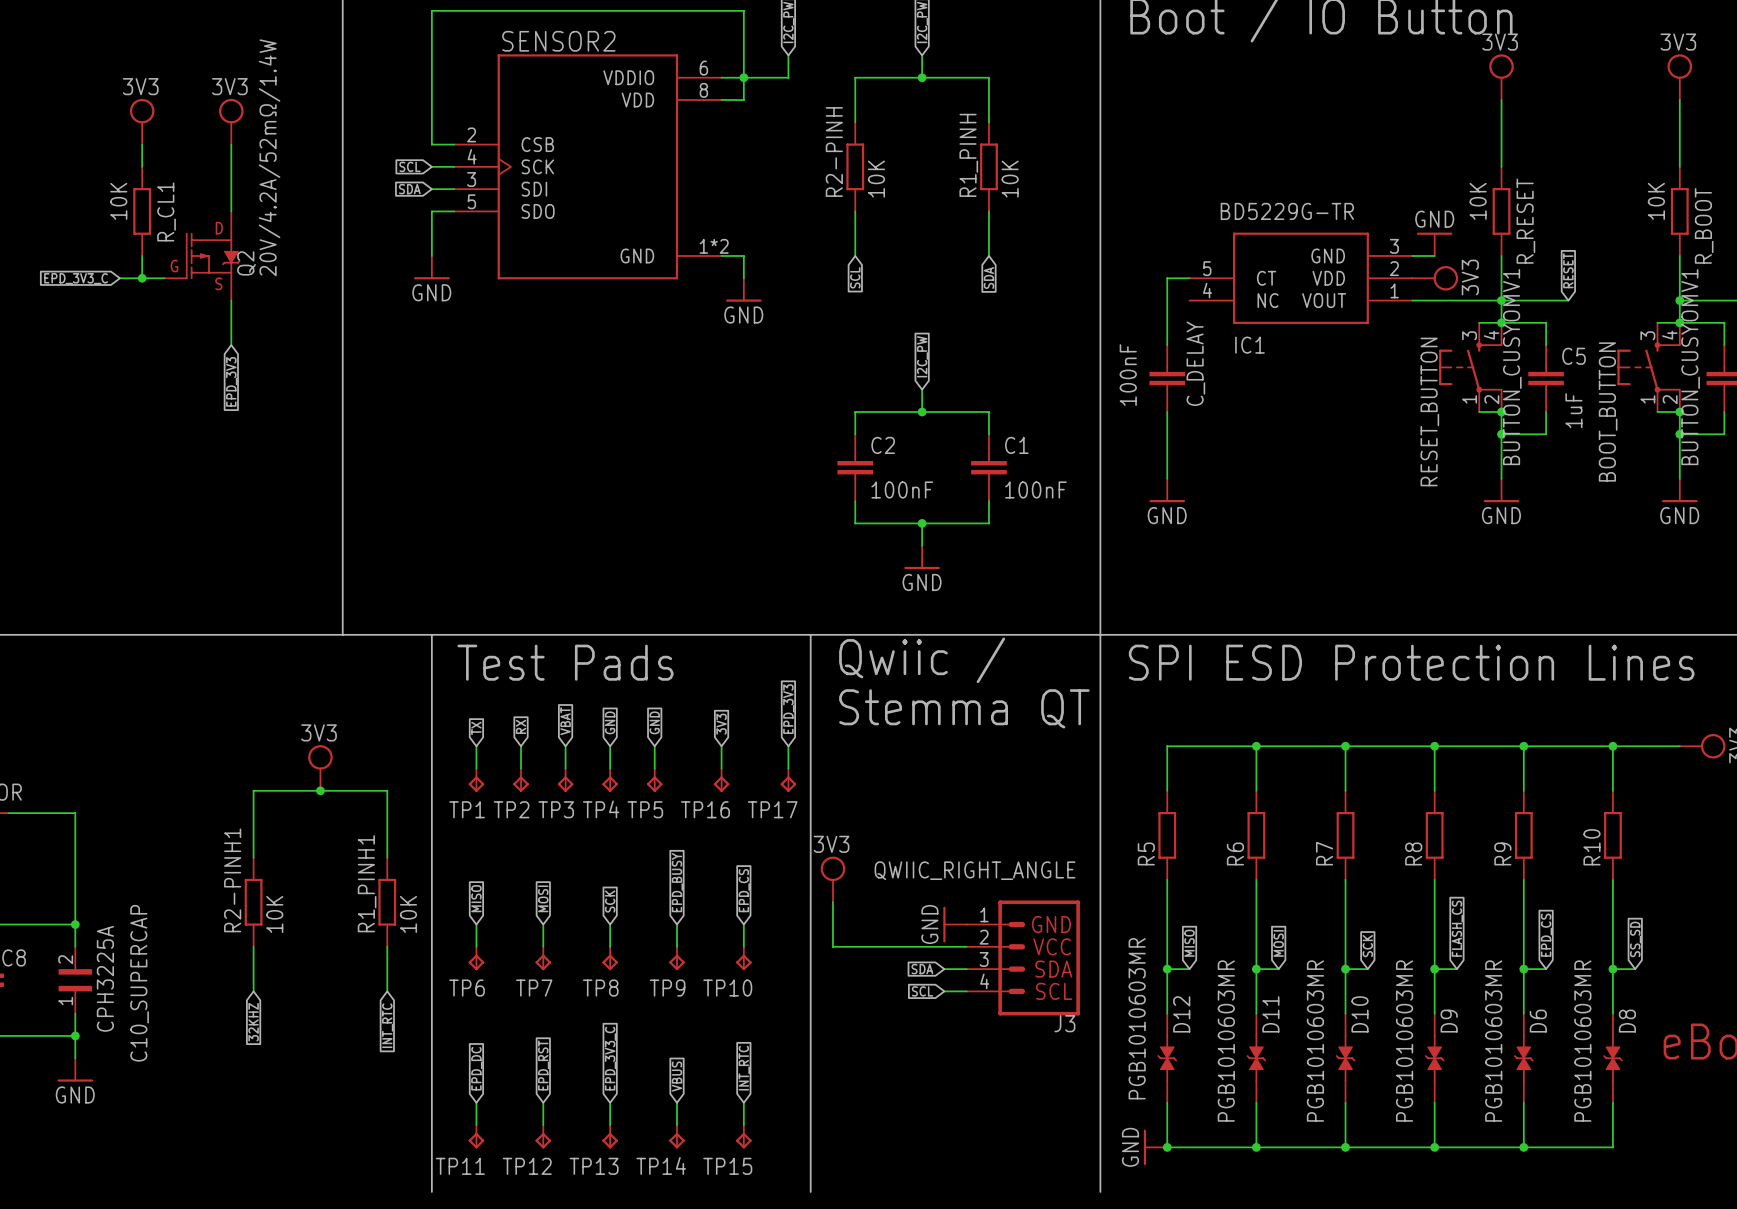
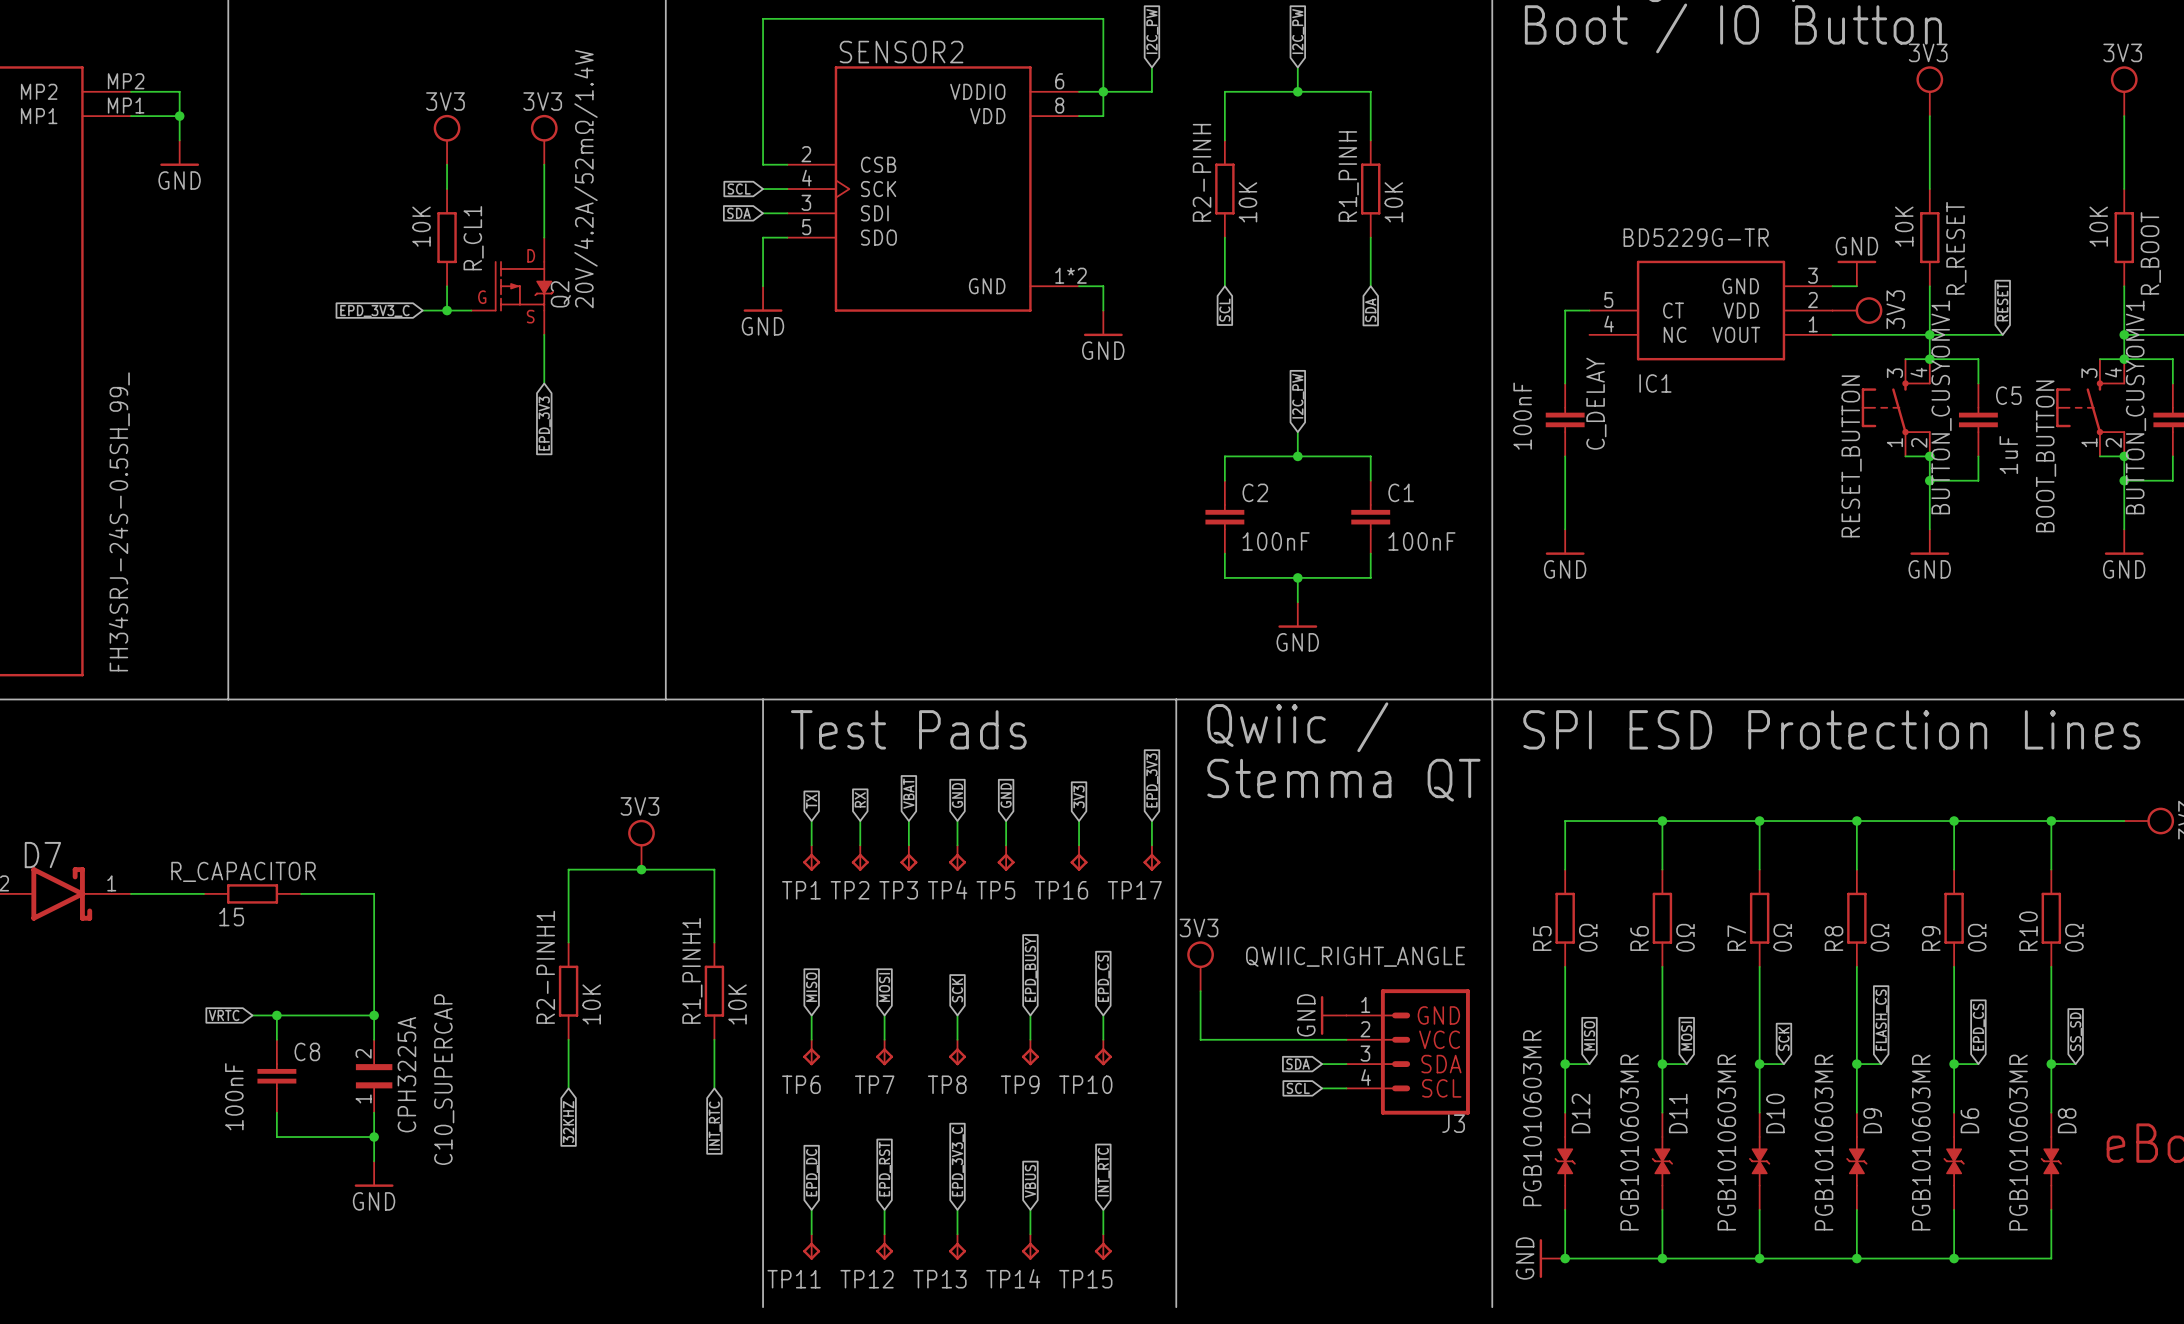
R5 value: none -> 0Ω (1588, 937)
R6 value: none -> 0Ω (1685, 937)
R7 value: none -> 0Ω (1782, 937)
R8 value: none -> 0Ω (1879, 937)
R9 value: none -> 0Ω (1977, 937)
R10 value: none -> 0Ω (2074, 937)

